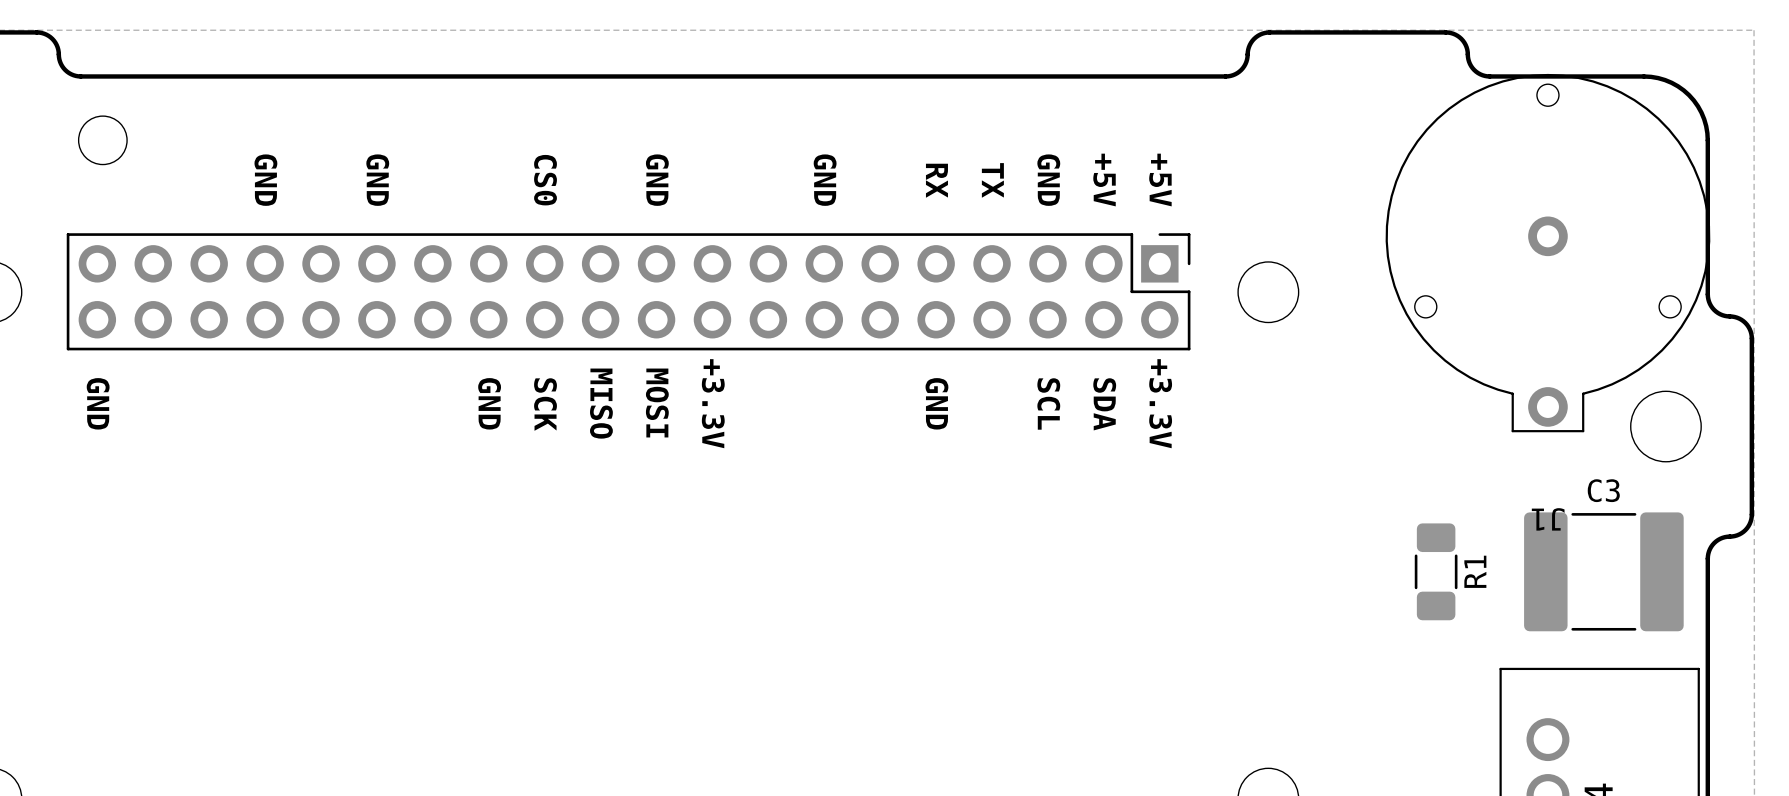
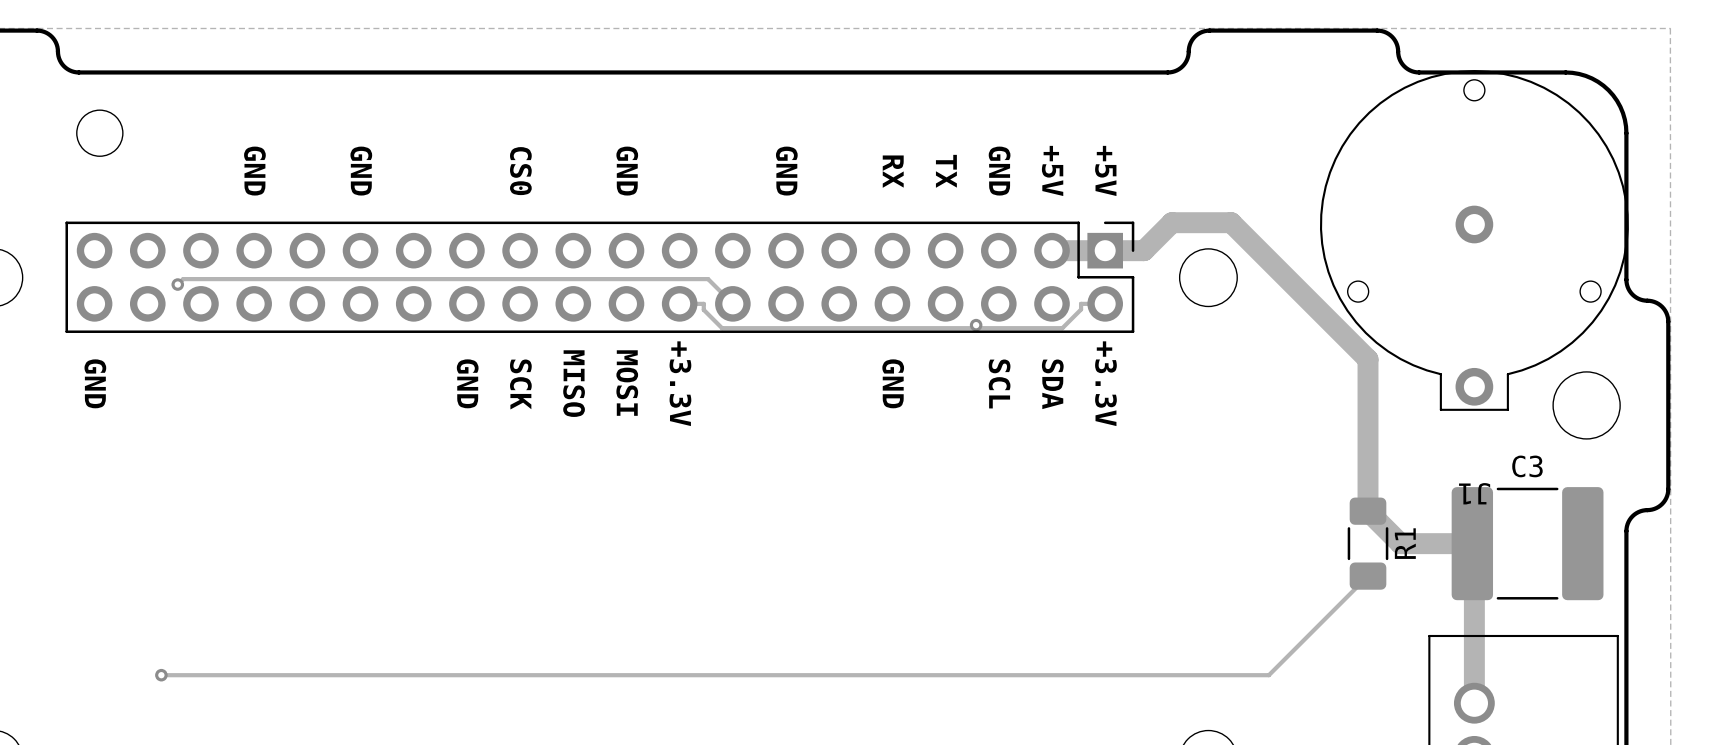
track: none -> (1052, 250) (1143, 250) (1171, 222) (1231, 222) (1368, 359) (1368, 511) (1400, 543) (1472, 543) (1474, 545) (1474, 703)
track: none -> (177, 284) (183, 279) (708, 279) (732, 303)
via: none -> (177, 284)
track: none -> (679, 303) (703, 303) (703, 309) (722, 328) (1062, 328) (1081, 309) (1081, 303) (1105, 303)
via: none -> (976, 325)
track: none -> (1368, 576) (1268, 675) (161, 675)
via: none -> (161, 675)

